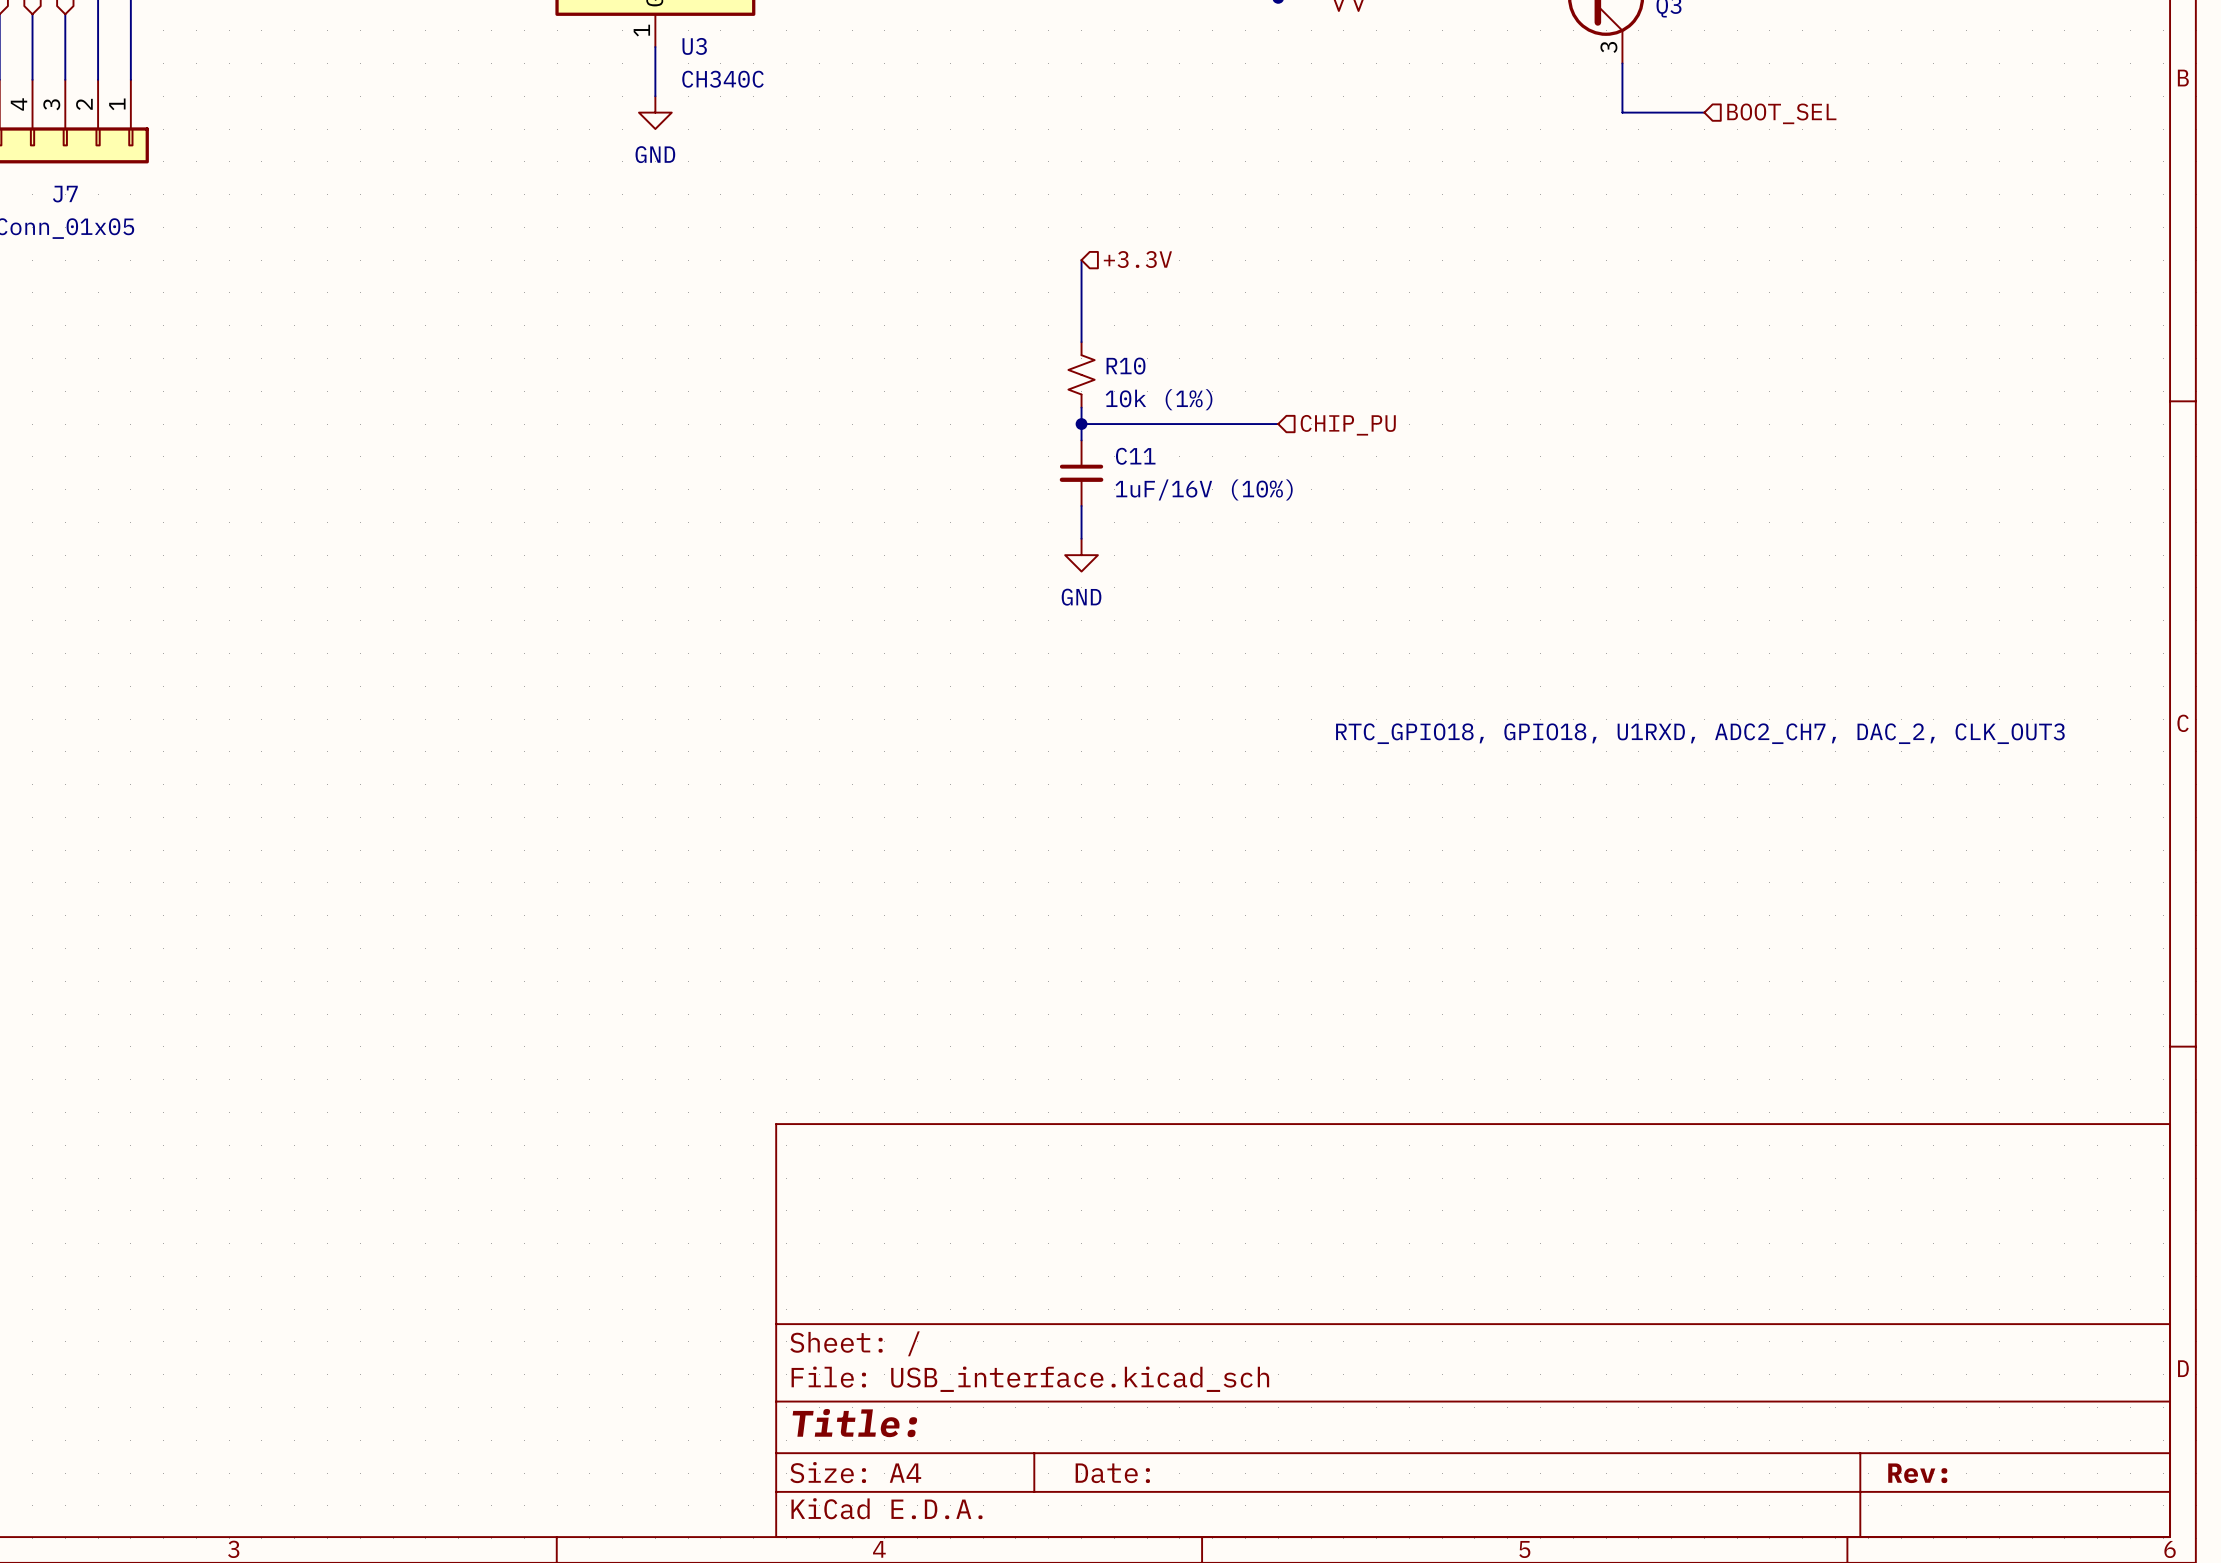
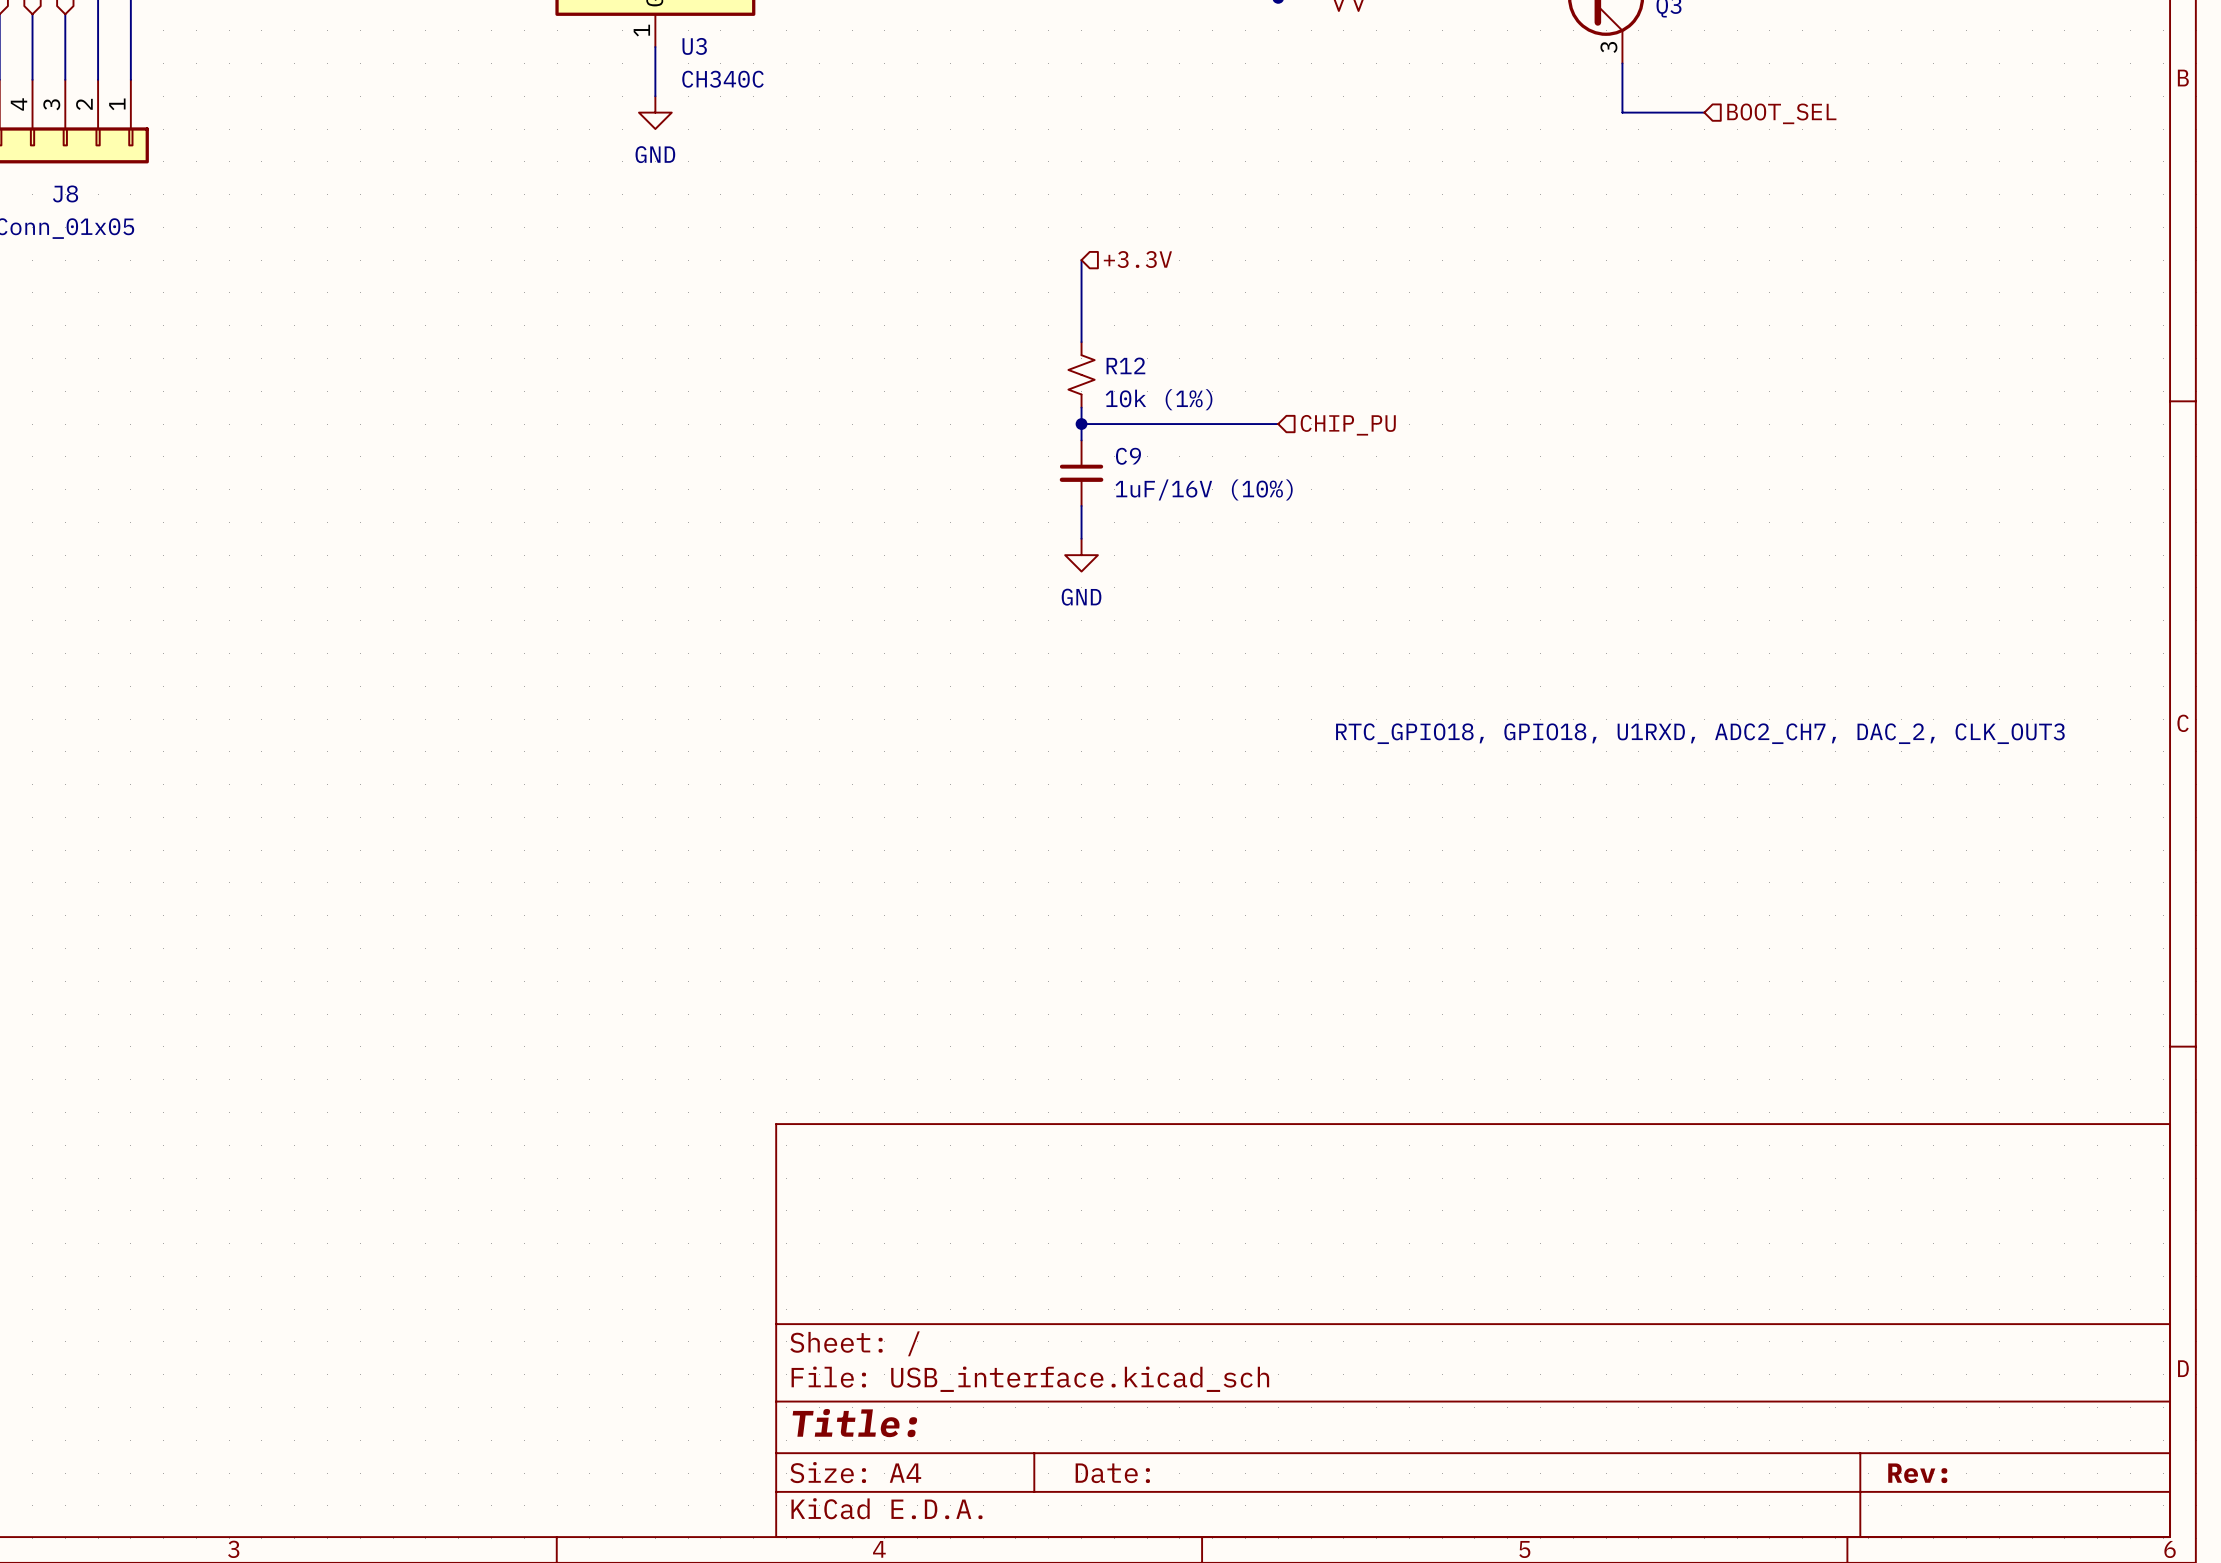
J7 name: J7 (65, 194) -> J8 (65, 193)
R10 name: R10 (1126, 366) -> R12 (1125, 365)
C11 name: C11 (1135, 456) -> C9 (1128, 456)

